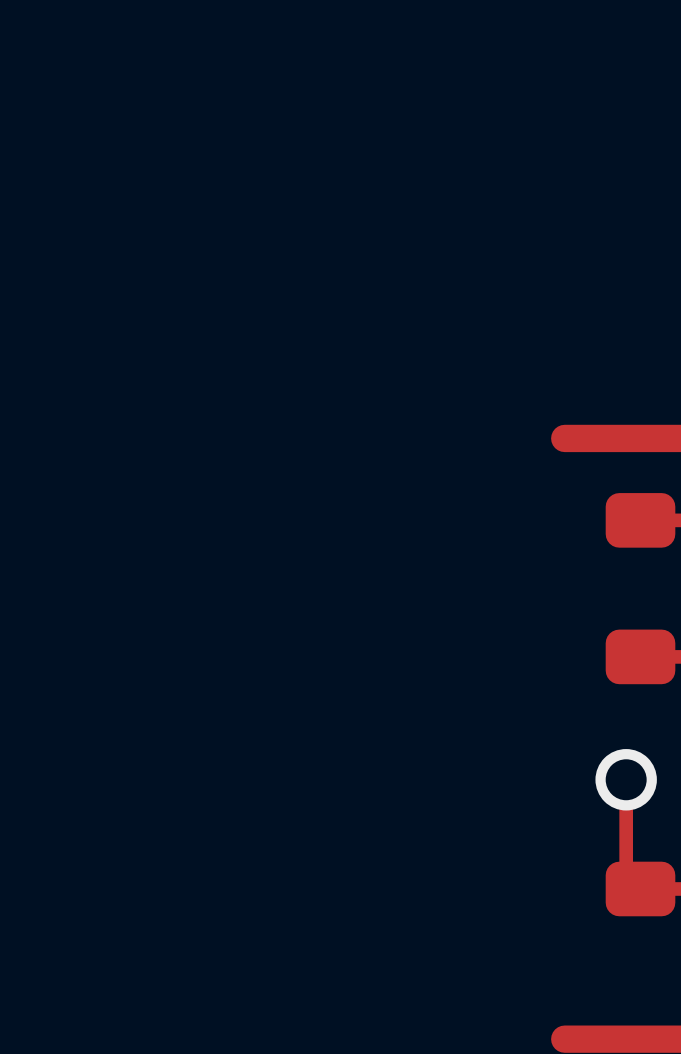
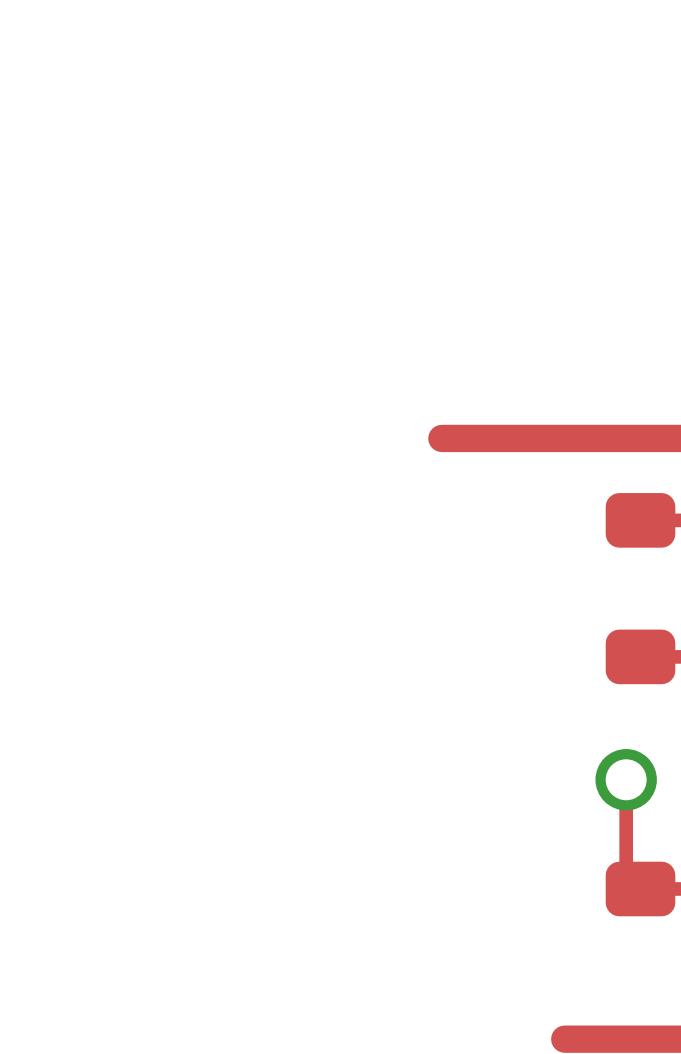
top track: none -> (564, 438) (441, 438)

